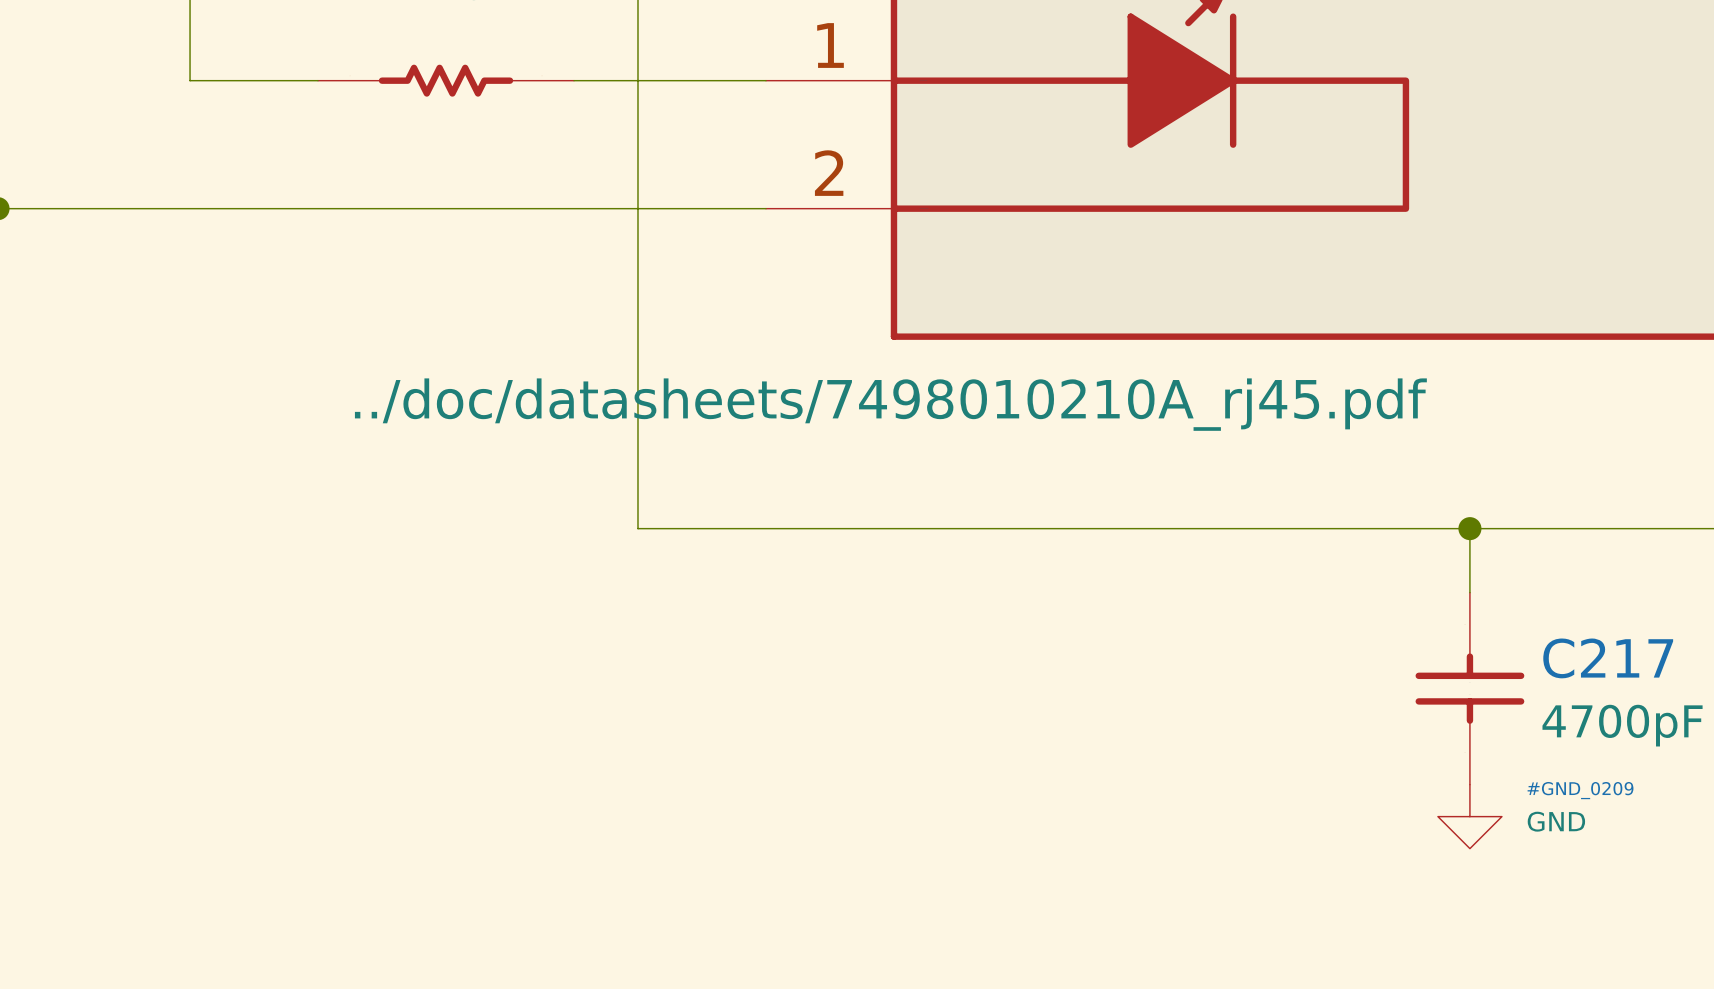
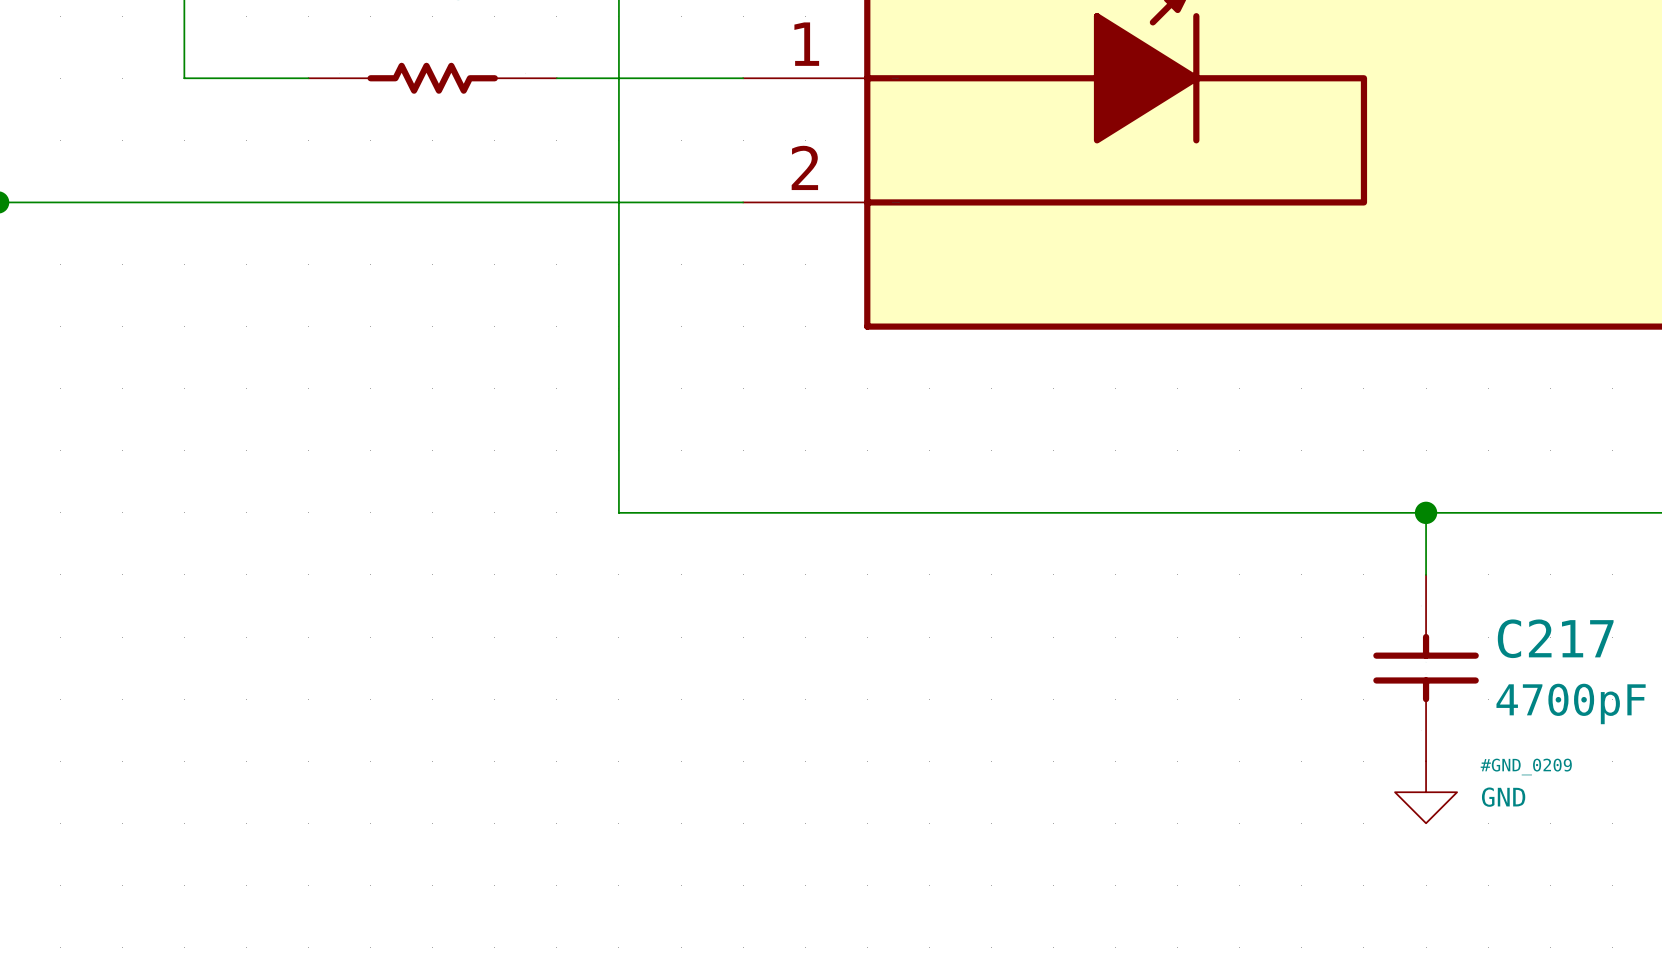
part text: ../doc/datasheets/7498010210A_rj45.pdf (890, 404) -> none

